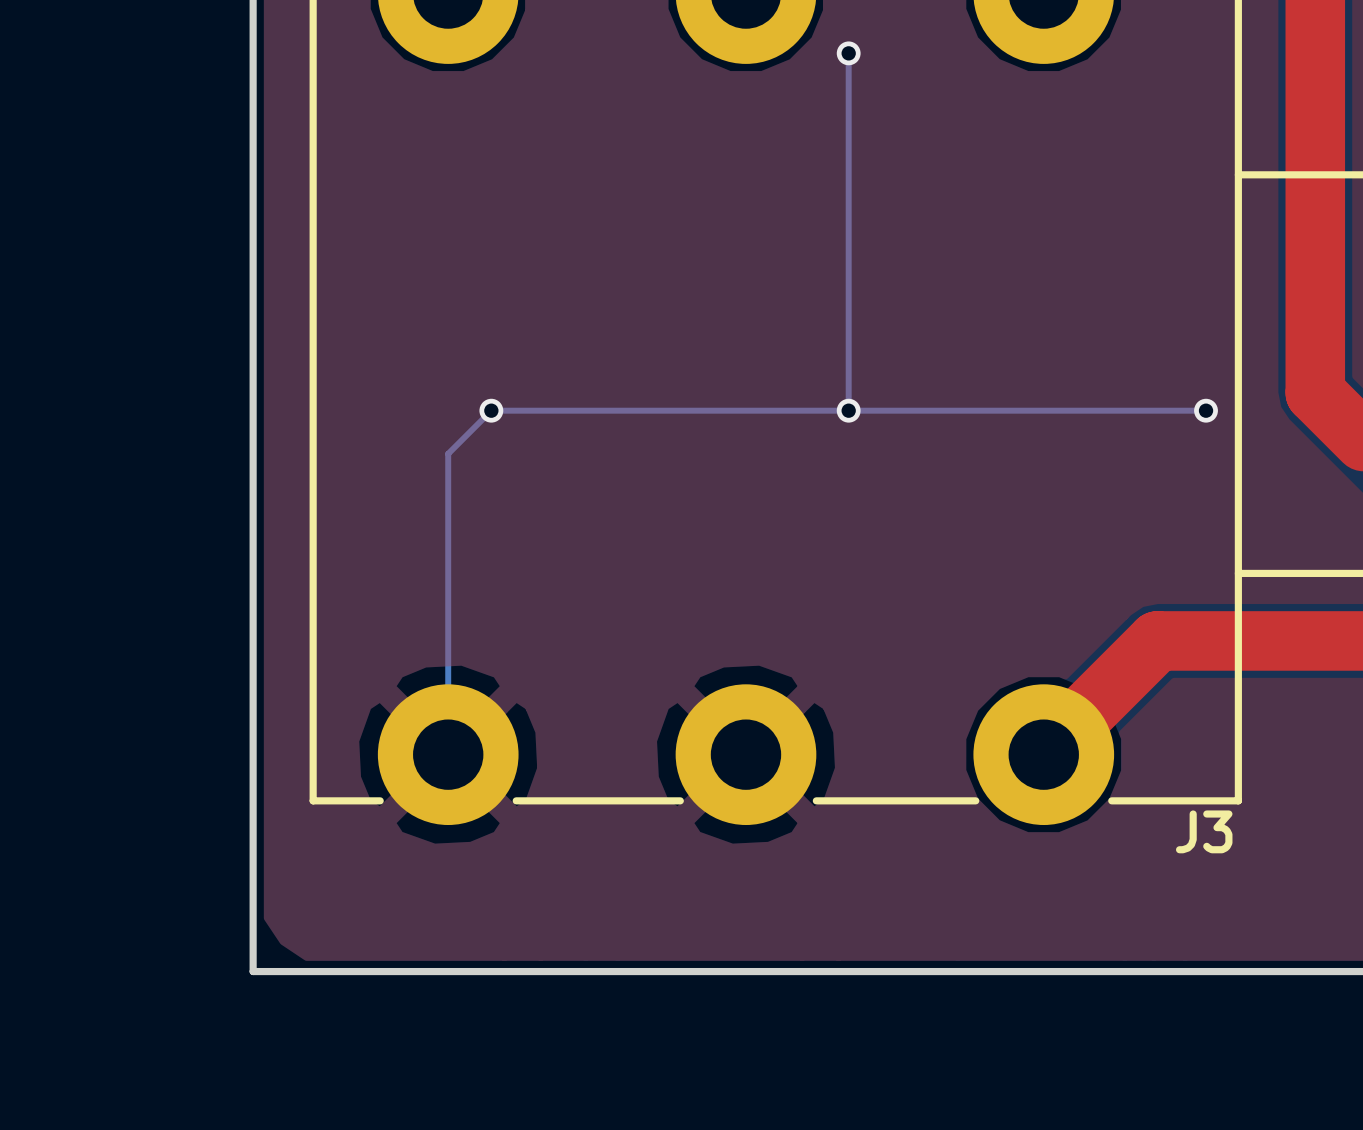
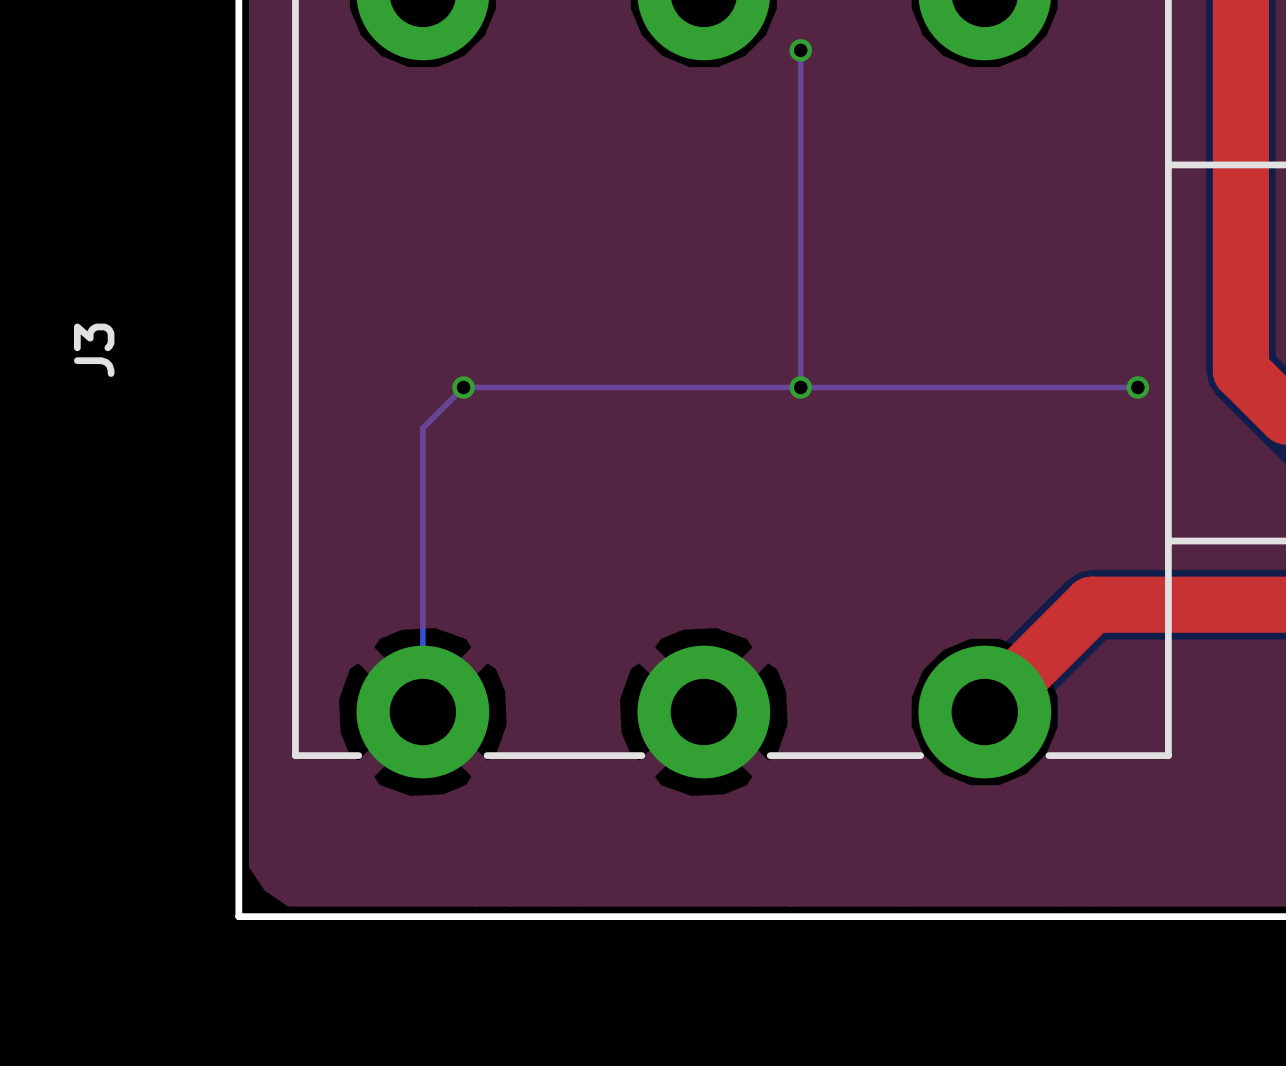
J3 name rotation: 0° (1204, 831) -> 90° counterclockwise (94, 350)
J3 name position: J3 (1204, 831) -> J3 (94, 350)

